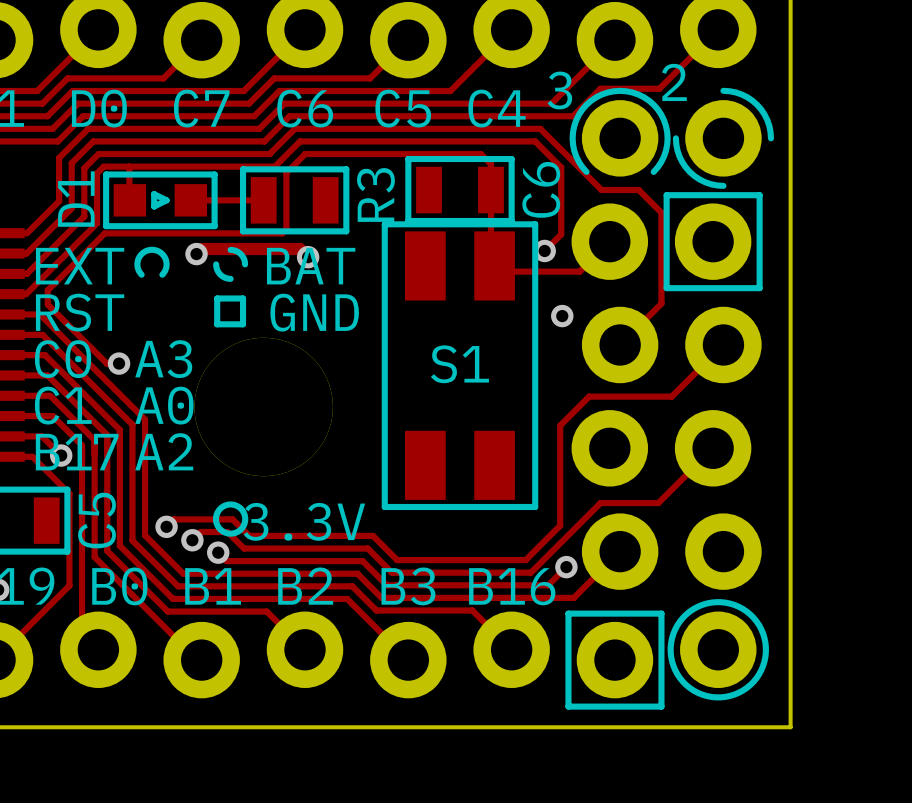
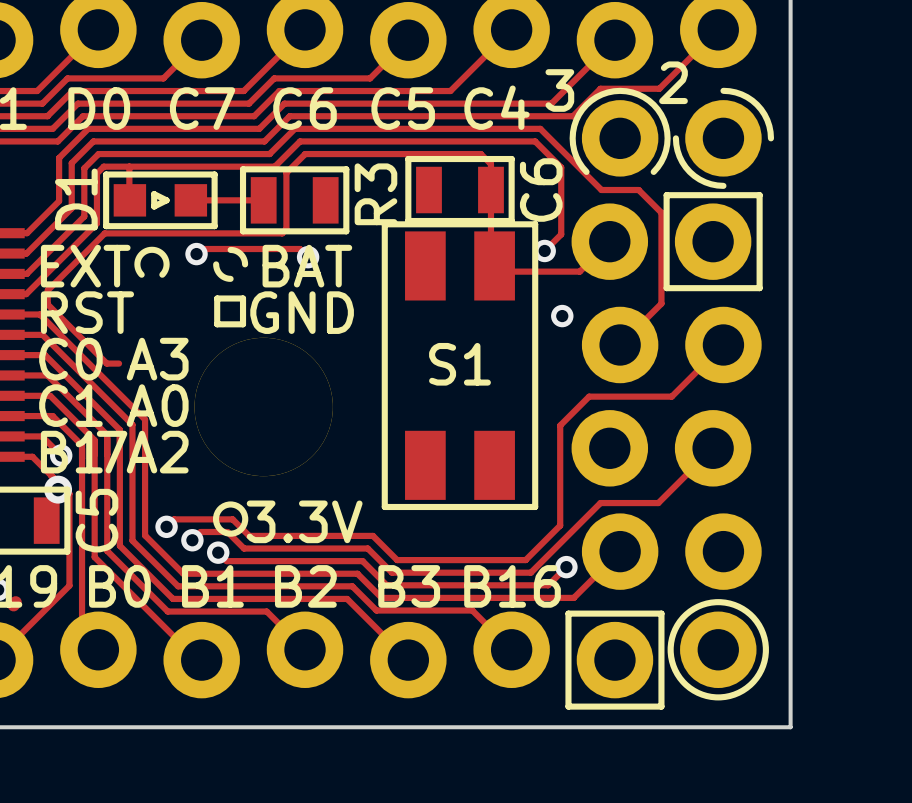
track width: thick (196, 254) (201, 249) (299, 249) (308, 257) -> thin (196, 254) (201, 249) (299, 249) (308, 257)
via: (119, 363) -> none
via: none -> (58, 489)
track: none -> (15, 602) (13, 605)

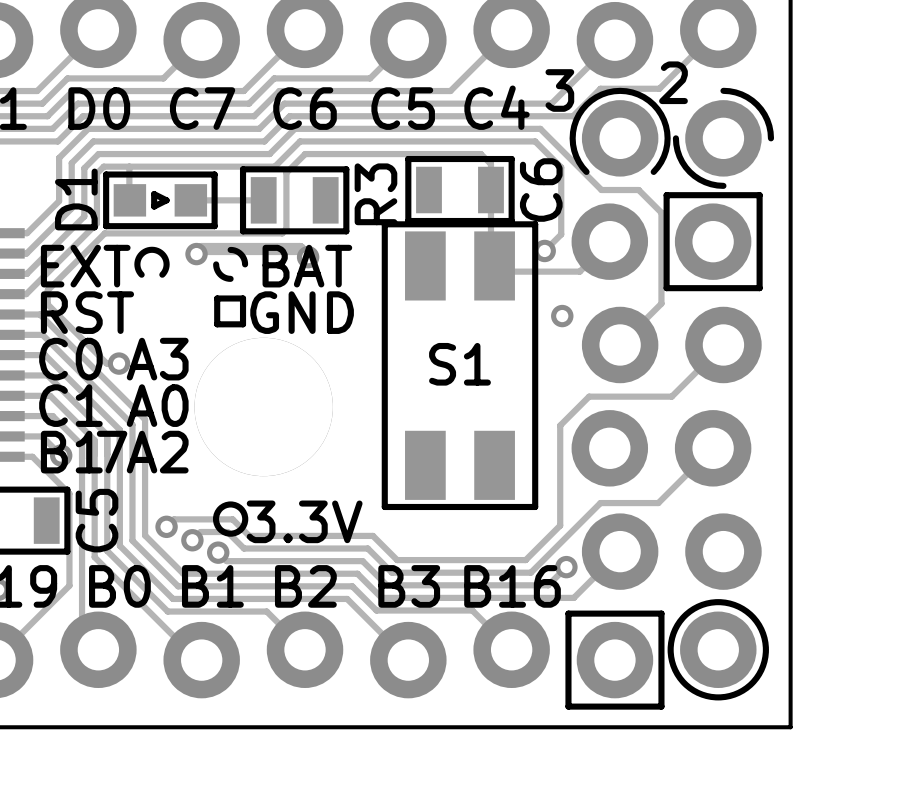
track width: thin (196, 254) (201, 249) (299, 249) (308, 257) -> thick (196, 254) (201, 249) (299, 249) (308, 257)
via: none -> (119, 363)
via: (58, 489) -> none
track: (15, 602) (13, 605) -> none

